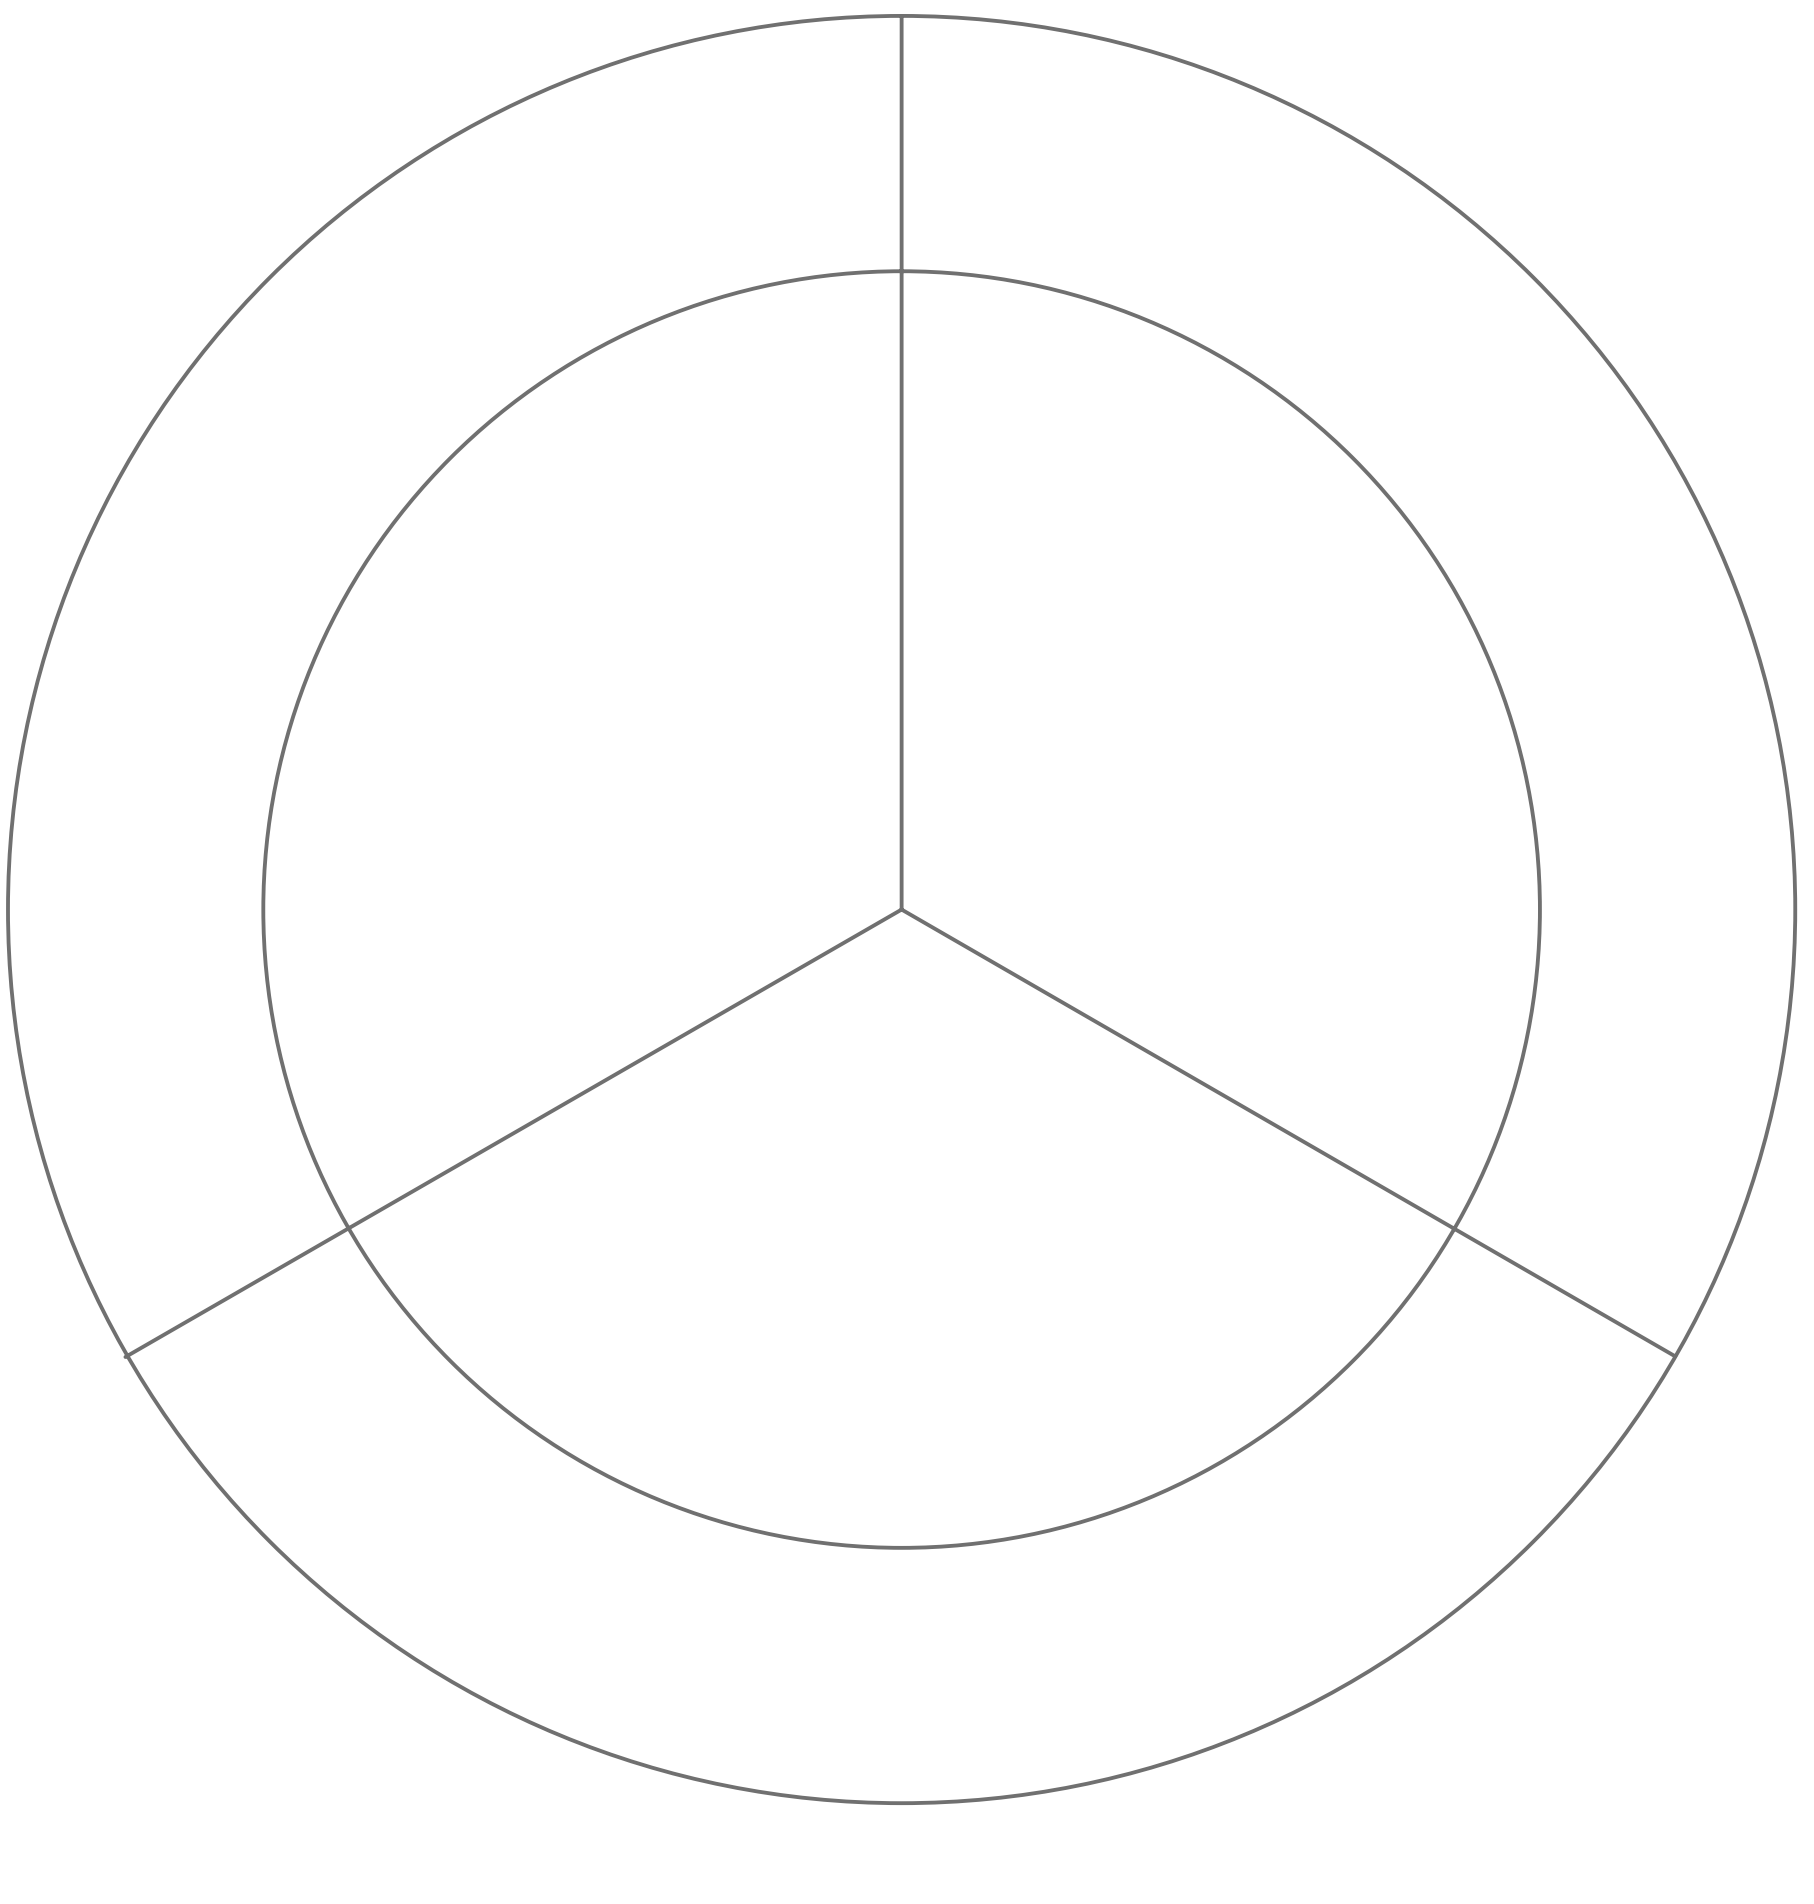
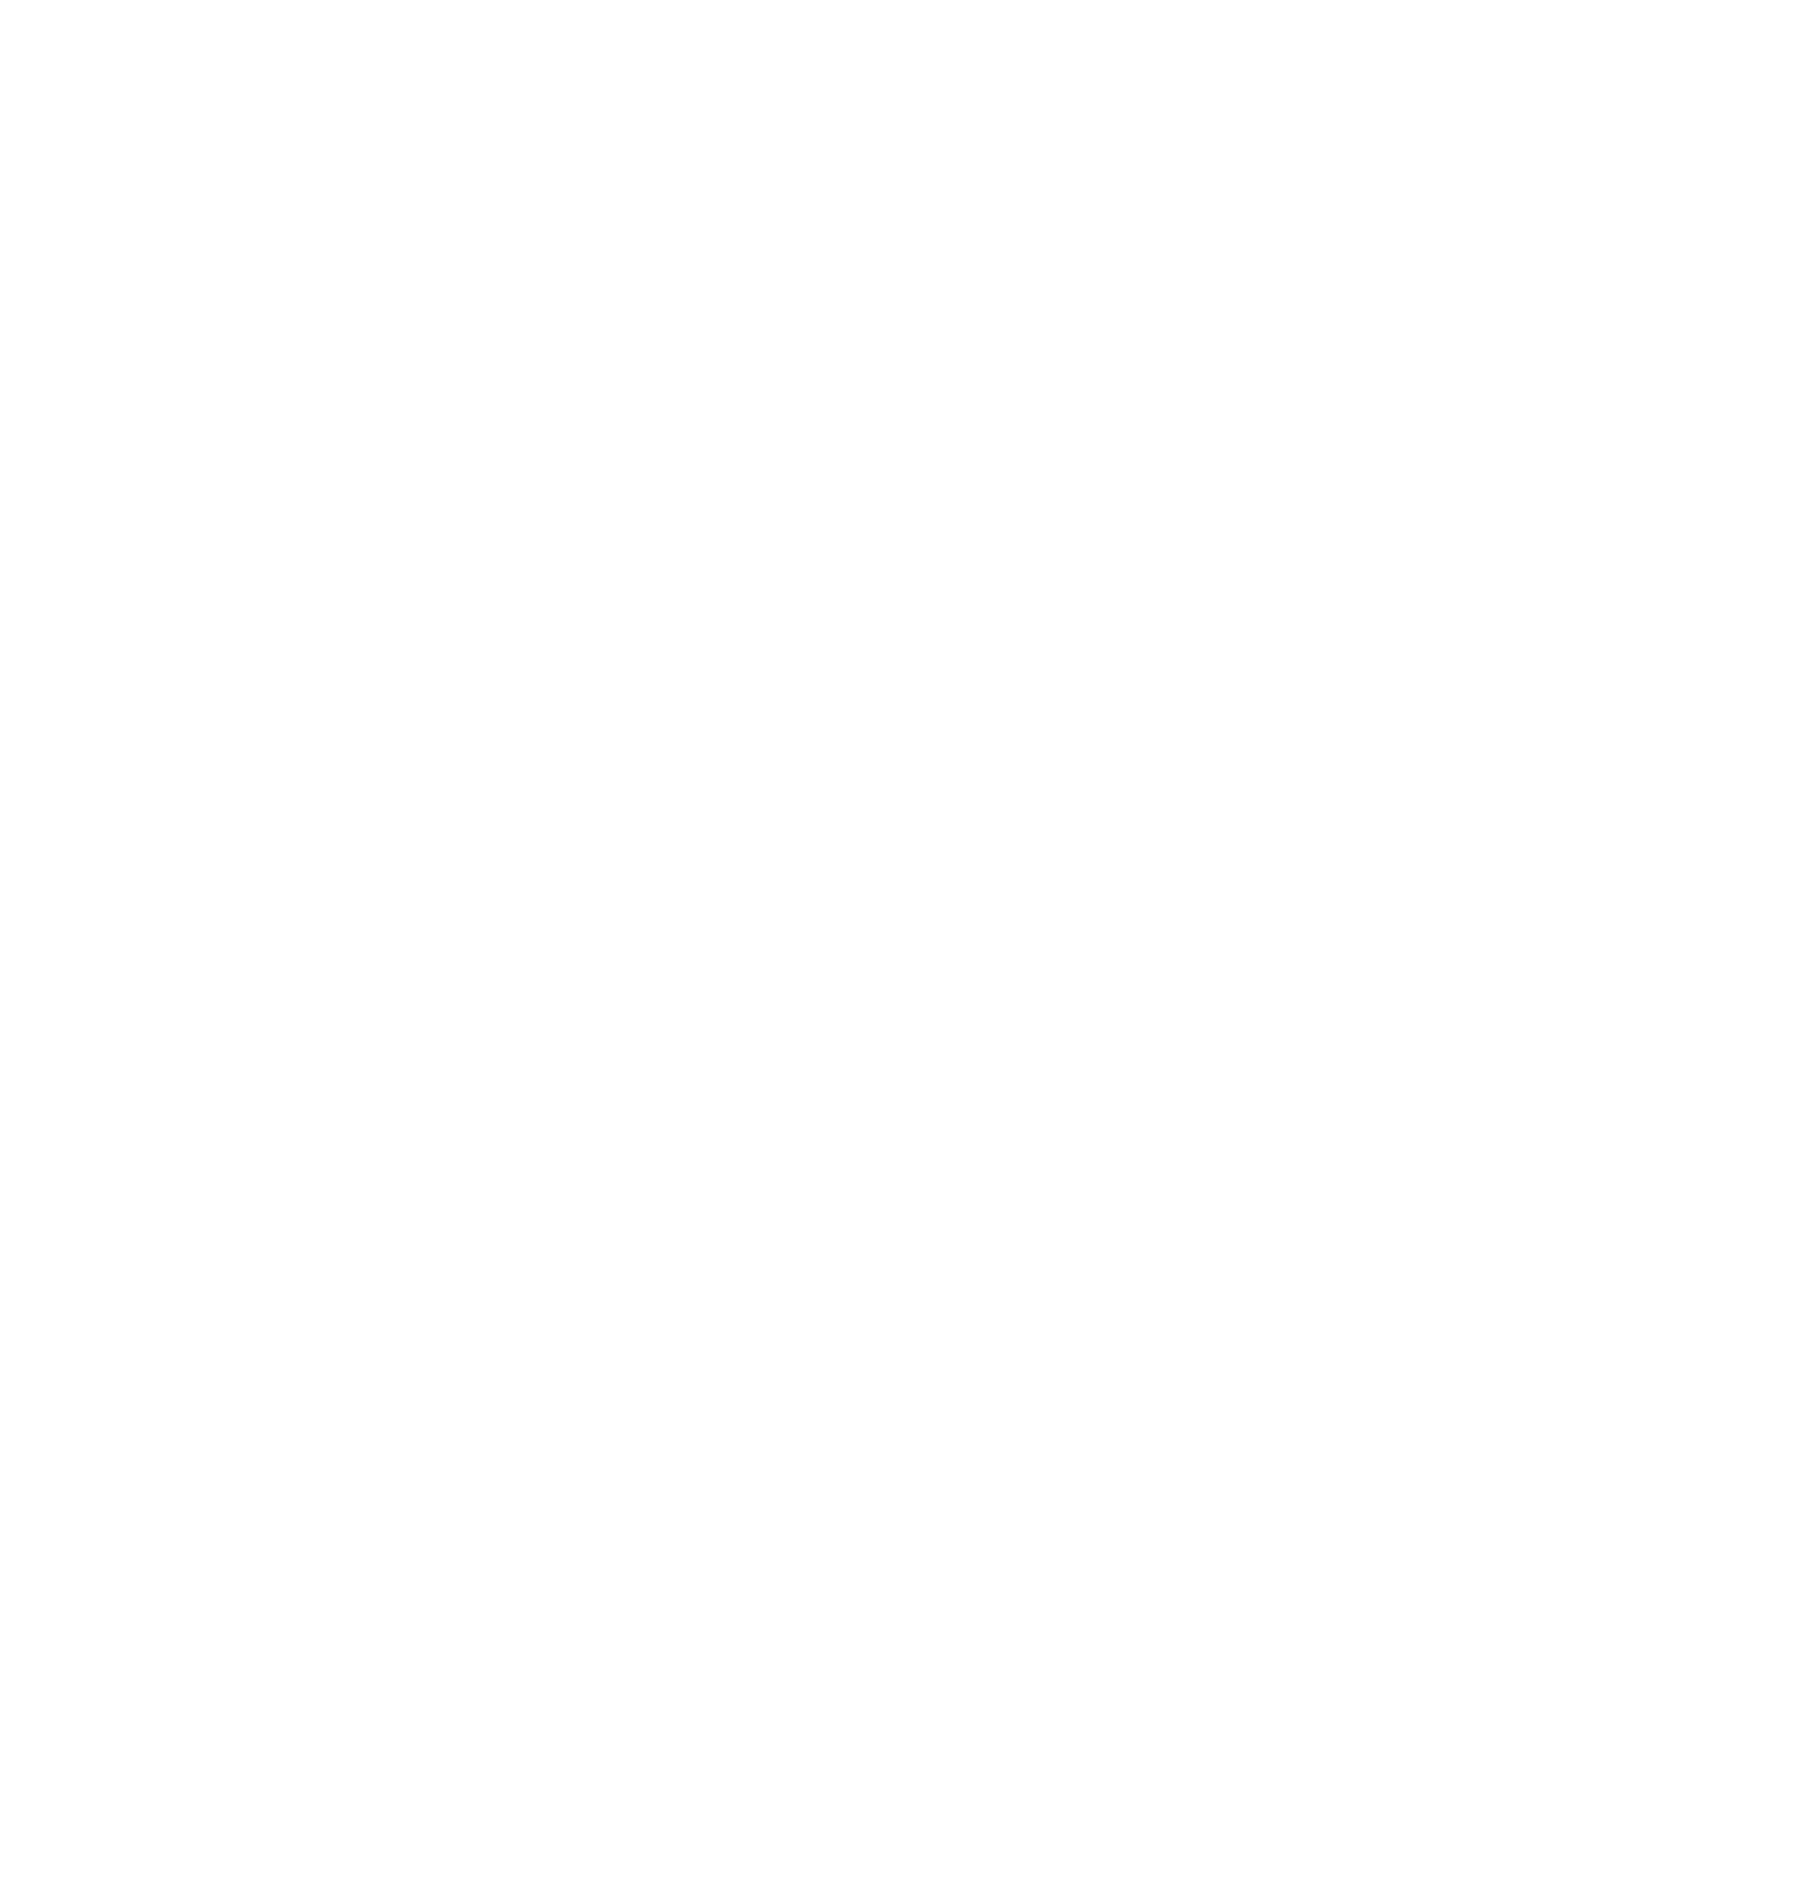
drawing: [6, 14, 1798, 1806] -> none
line: (901, 15) (901, 909) -> none
line: (901, 909) (125, 1357) -> none
line: (901, 909) (1675, 1356) -> none

